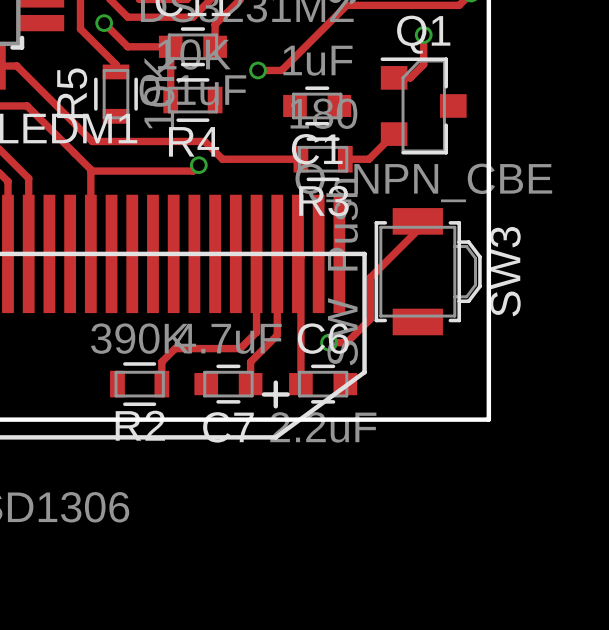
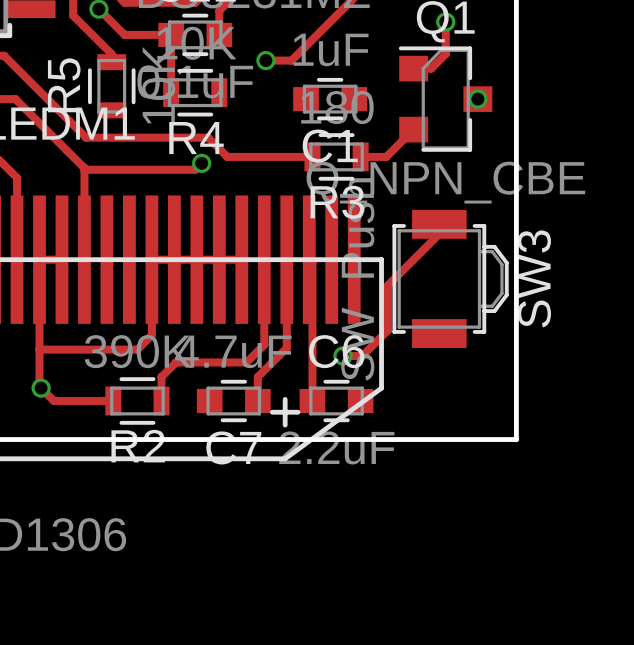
via: none -> (477, 99)
track: none -> (61, 259) (39, 259) (39, 386) (53, 401) (113, 401)
track: none -> (241, 259) (151, 259) (151, 335) (137, 349) (39, 349)
via: none -> (41, 388)

